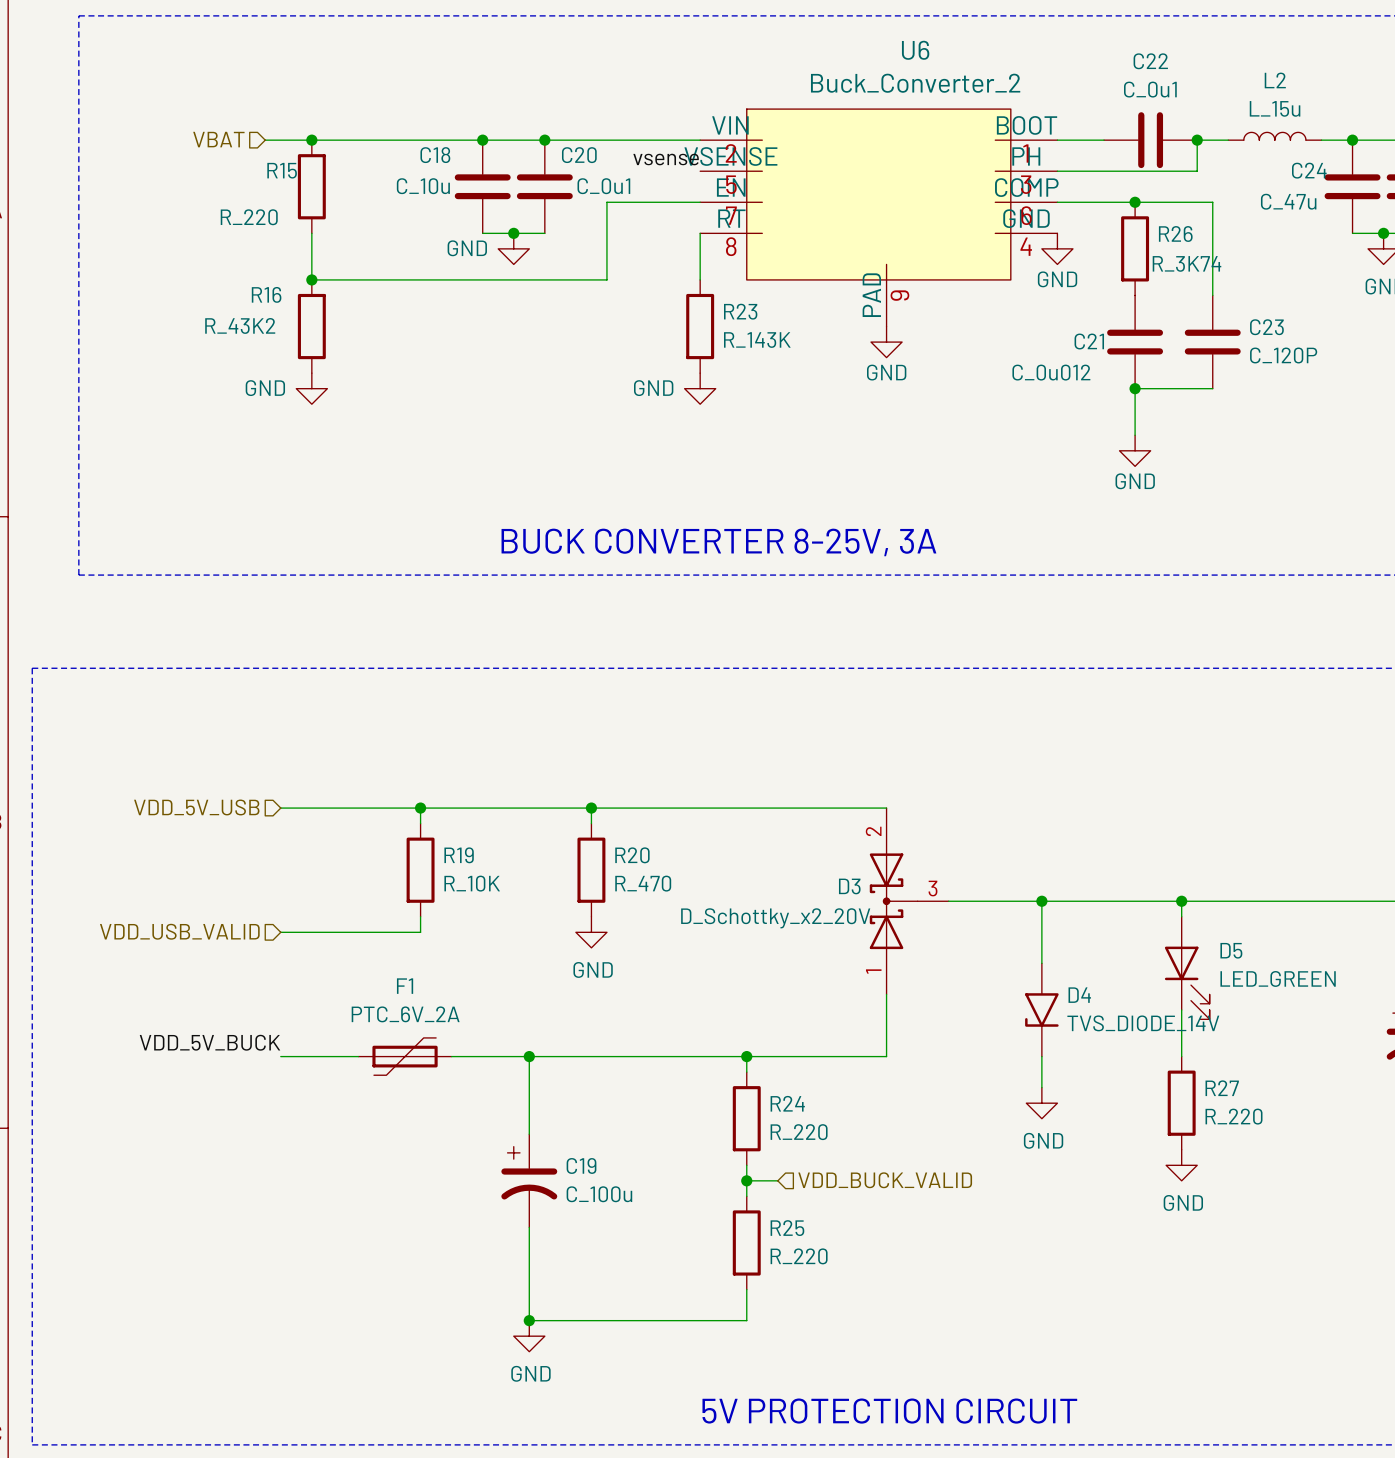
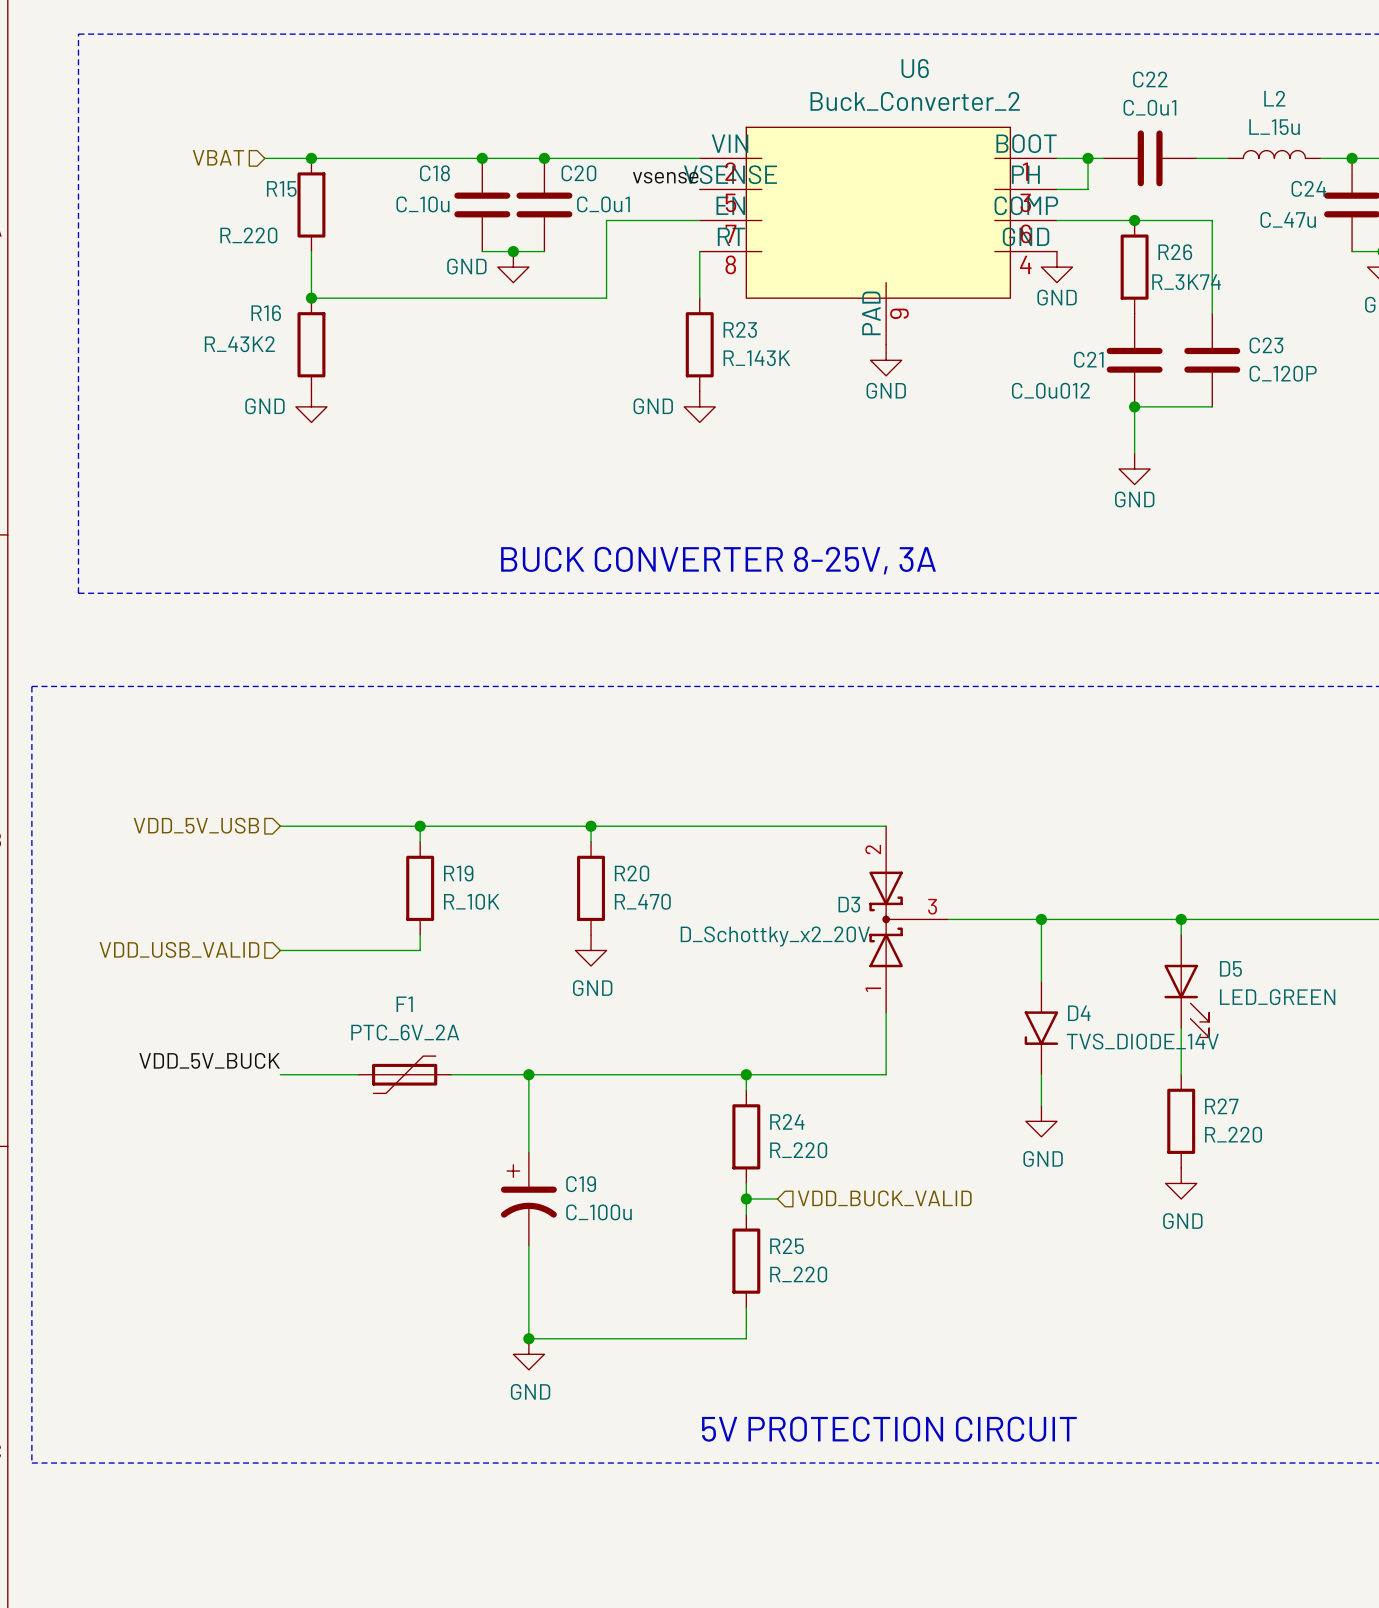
junction: none -> (1088, 158)
wire: (1197, 140) (1197, 171) (1088, 171) -> (1088, 158) (1088, 189)
junction: (1197, 140) -> none

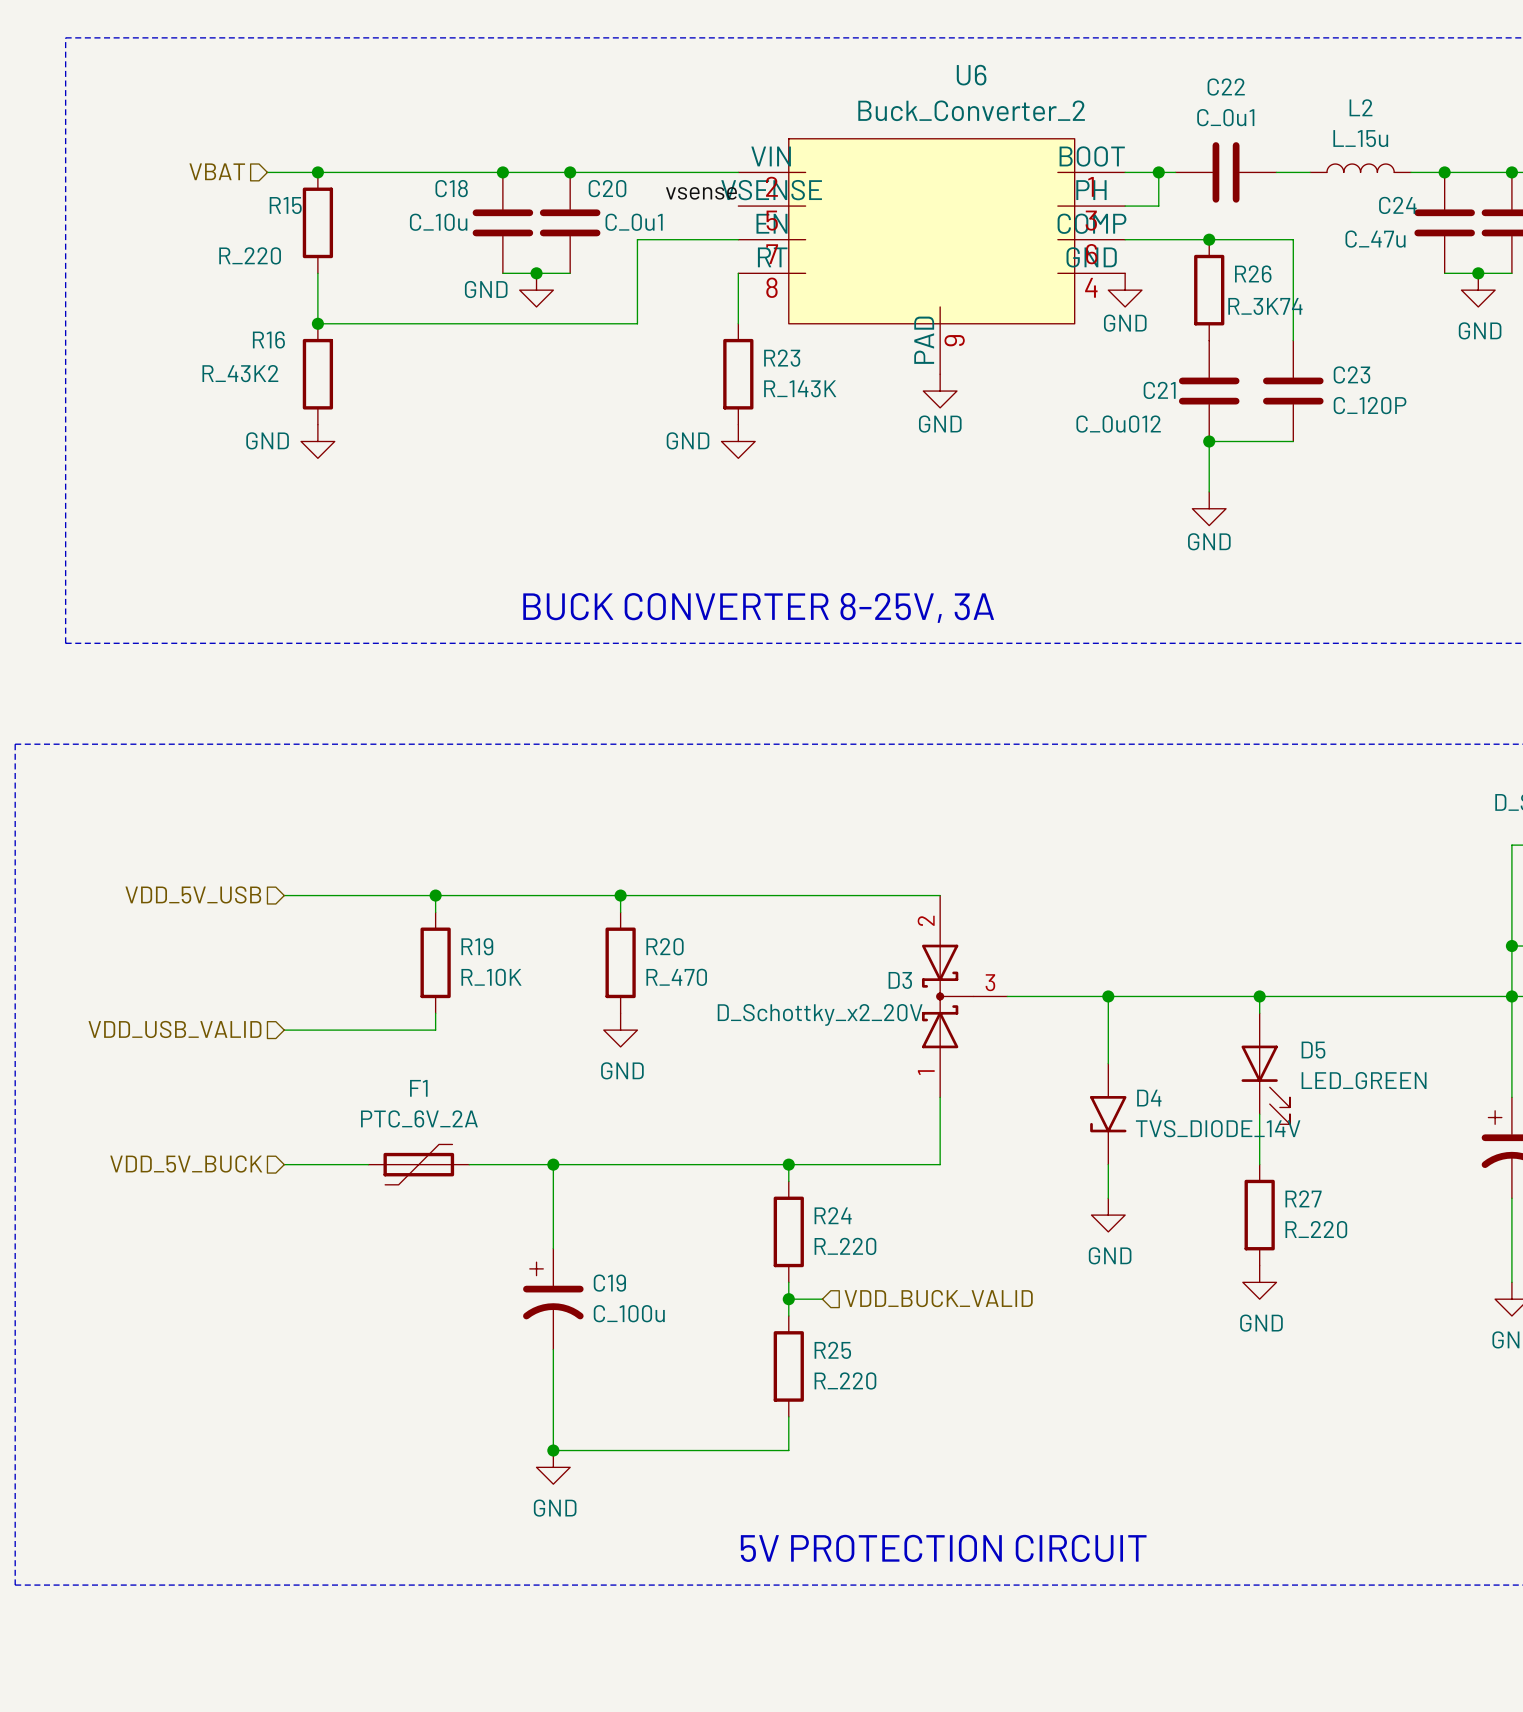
label: VDD_5V_BUCK (209, 1060) -> none
hierarchical label: none -> VDD_5V_BUCK (186, 1164)

